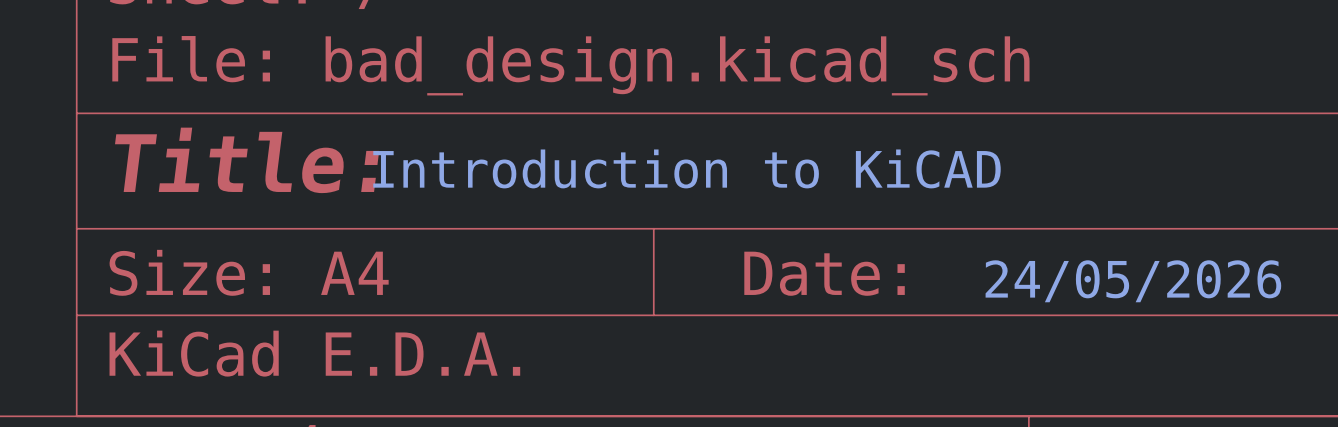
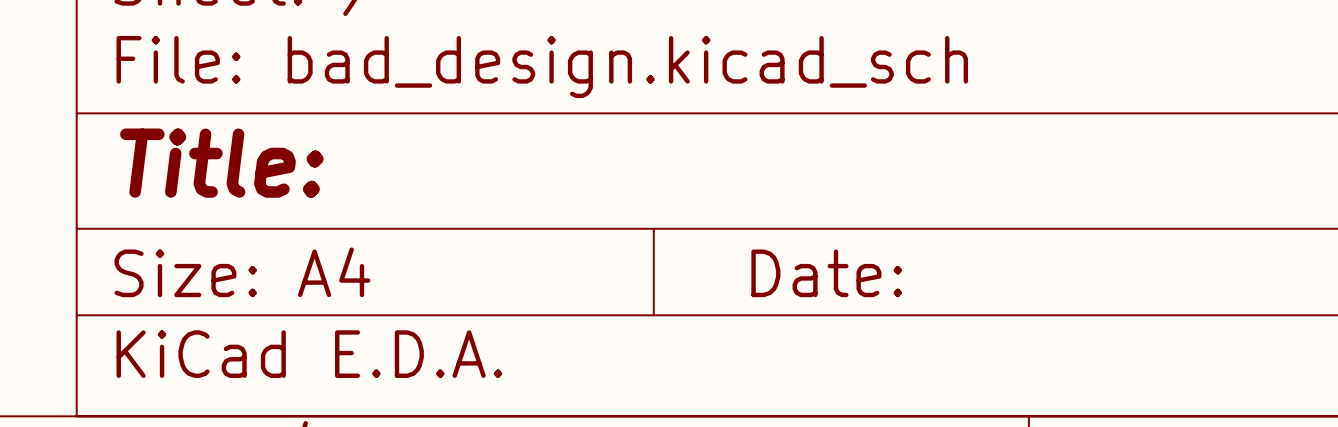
text: Introduction to KiCAD (687, 168) -> none
text: 24/05/2026 (1133, 281) -> none

